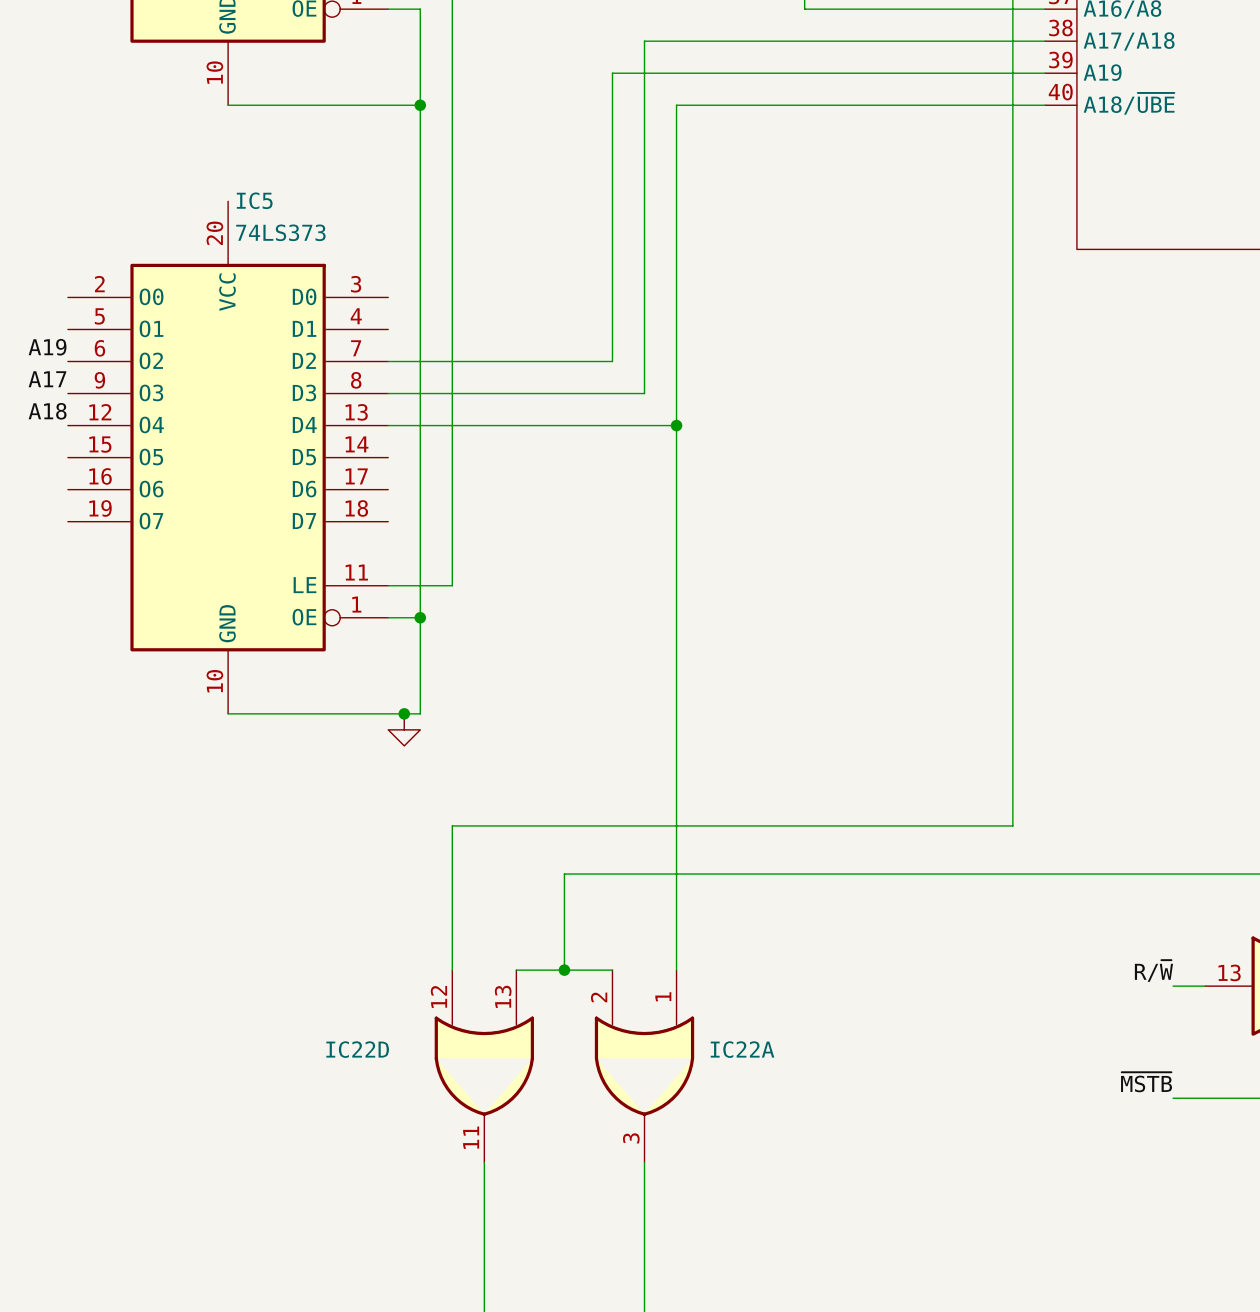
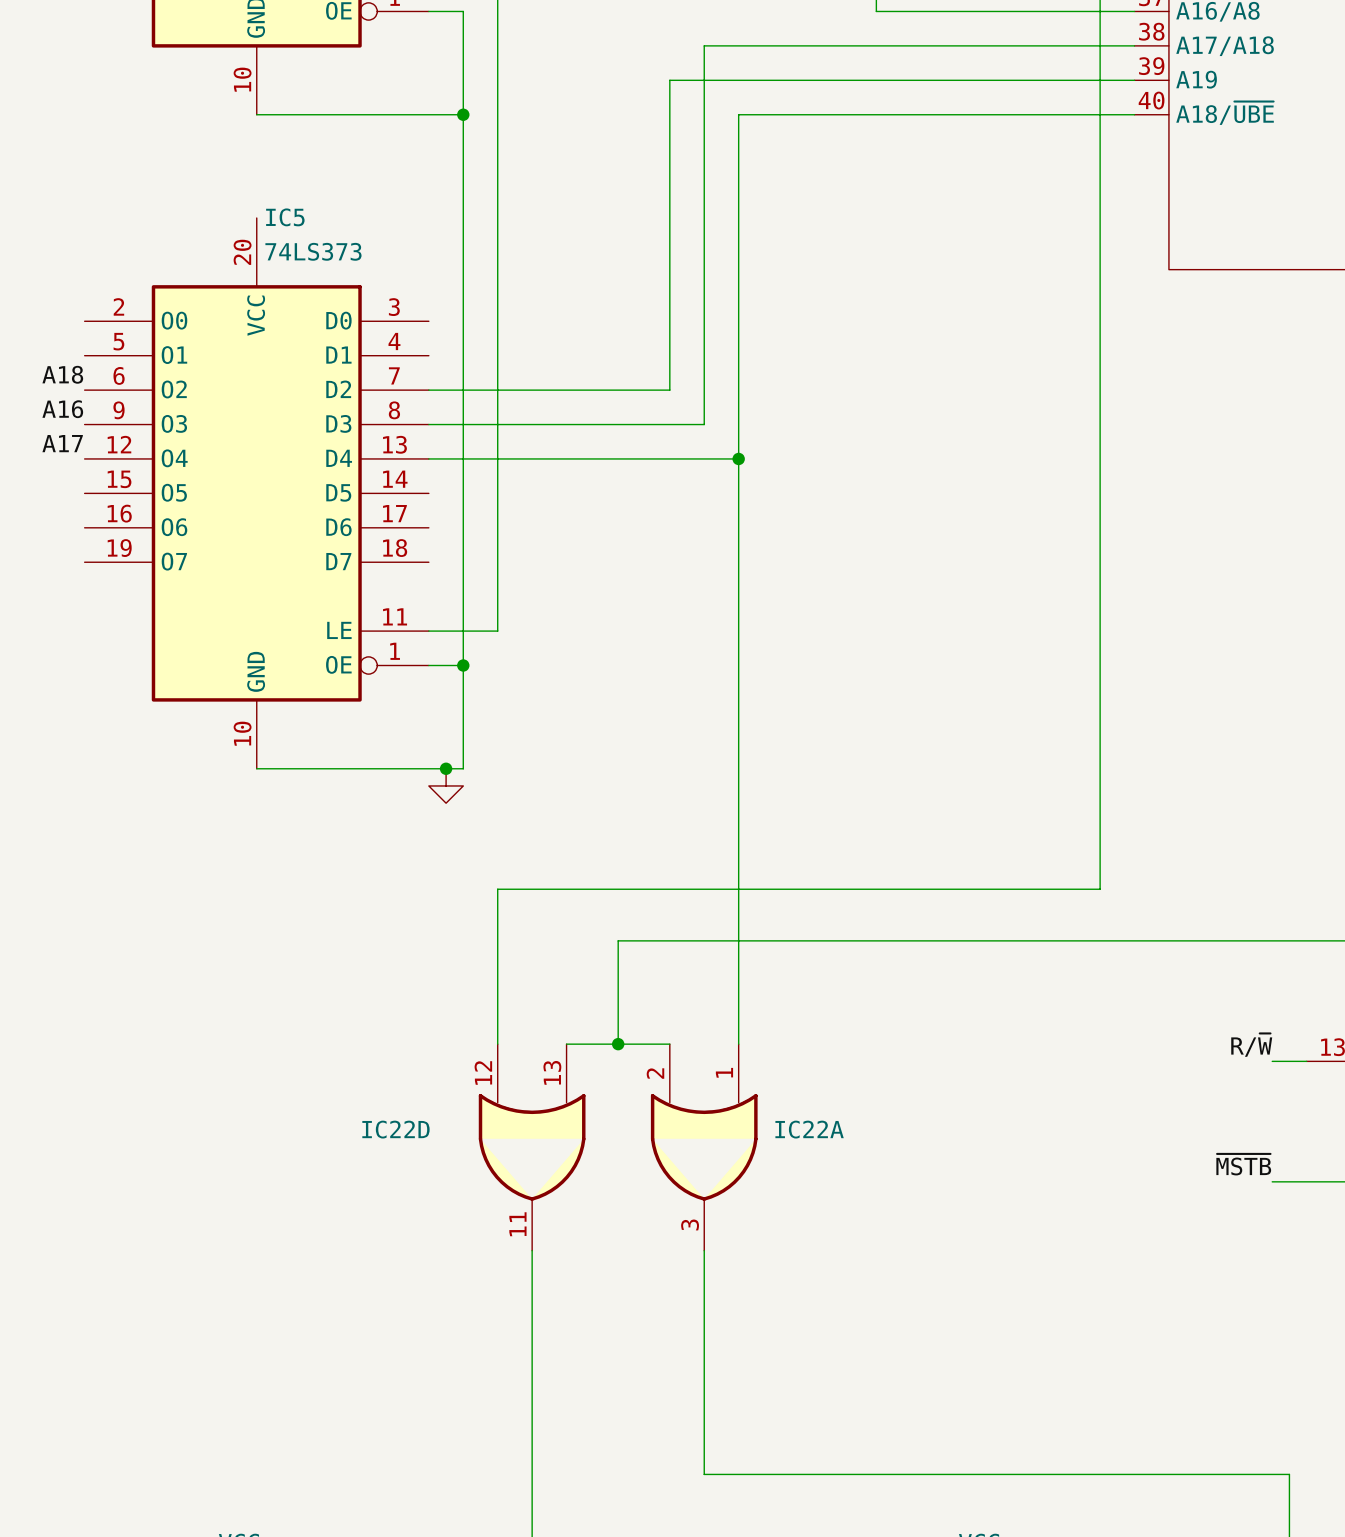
label: A19 (47, 347) -> A18 (62, 374)
label: A17 (47, 379) -> A16 (62, 409)
label: A18 (47, 411) -> A17 (62, 443)

